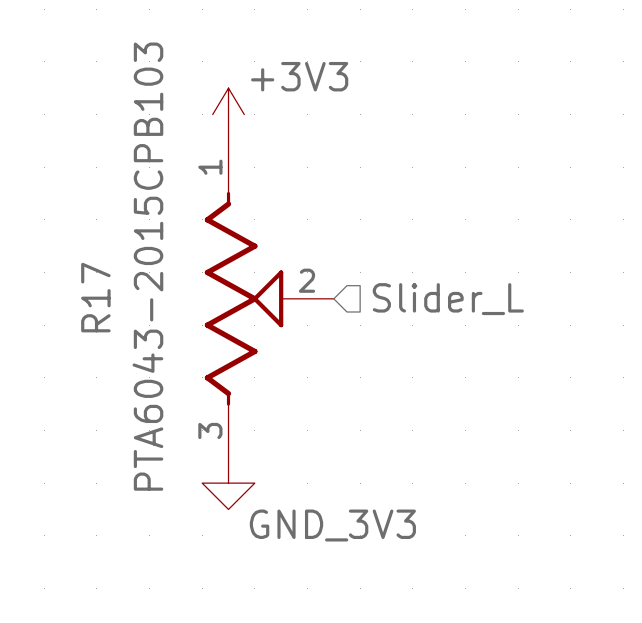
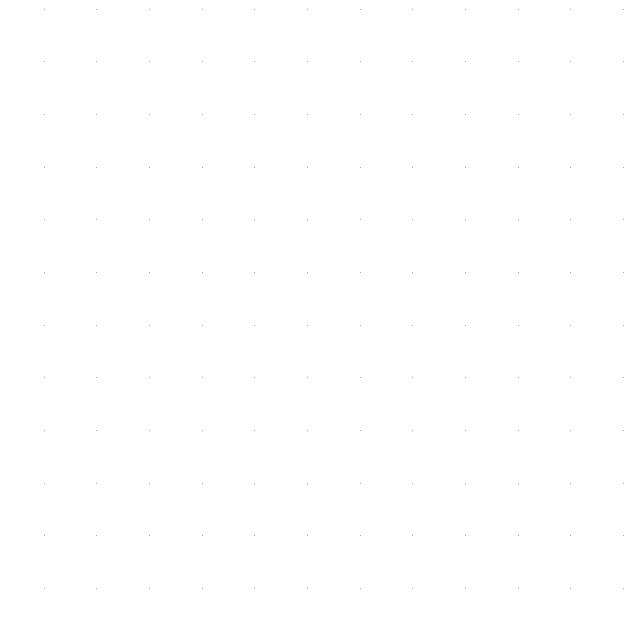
power symbol: +3V3 (228, 114) -> none
R17: PTA6043-2015CPB103 (269, 298) -> none
hierarchical label: Slider_L (448, 299) -> none
power symbol: GND_3V3 (228, 483) -> none

